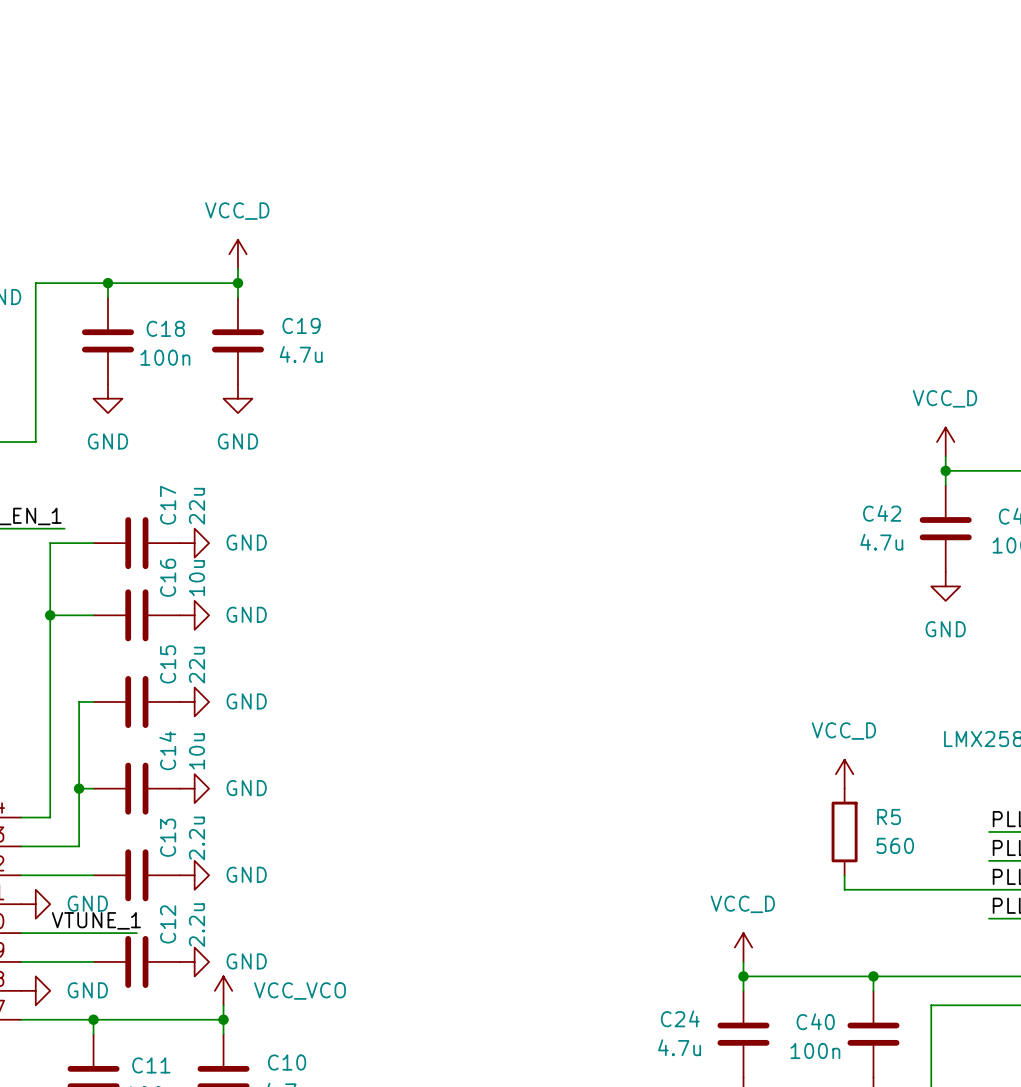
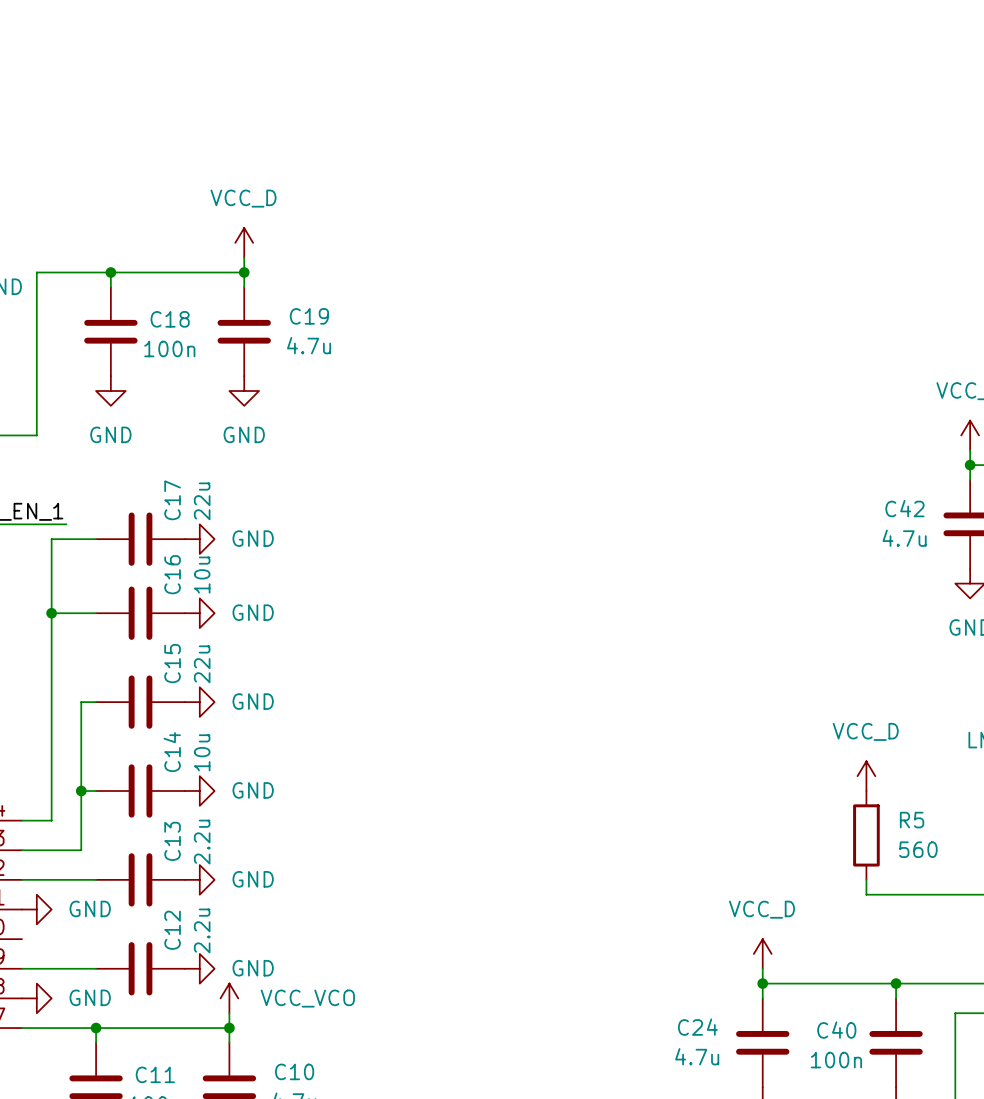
label: VTUNE_1 (96, 920) -> none
wire: (21, 933) (136, 933) -> none

